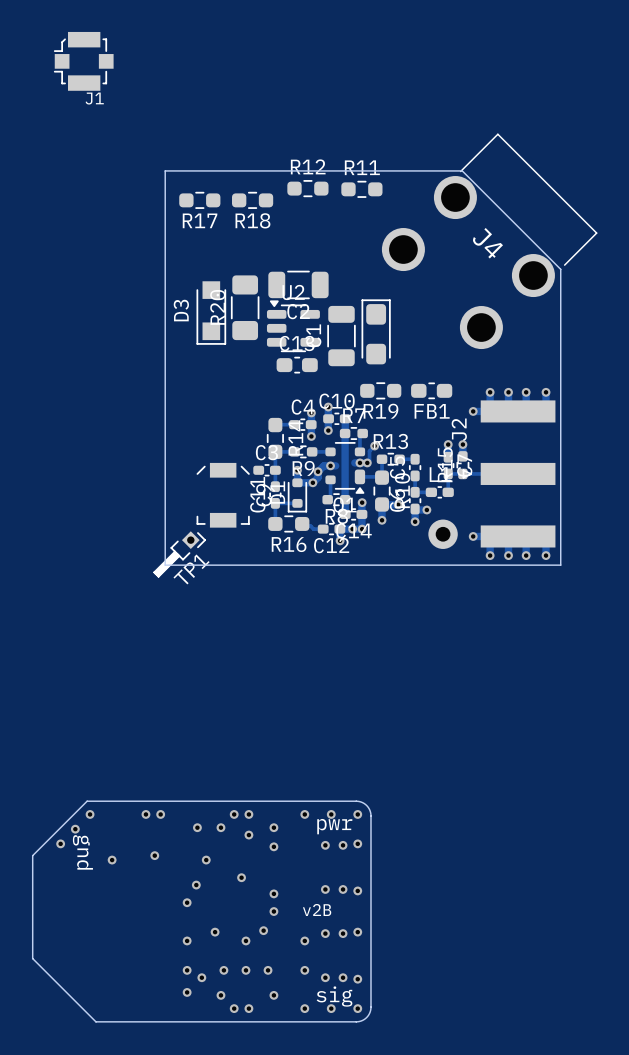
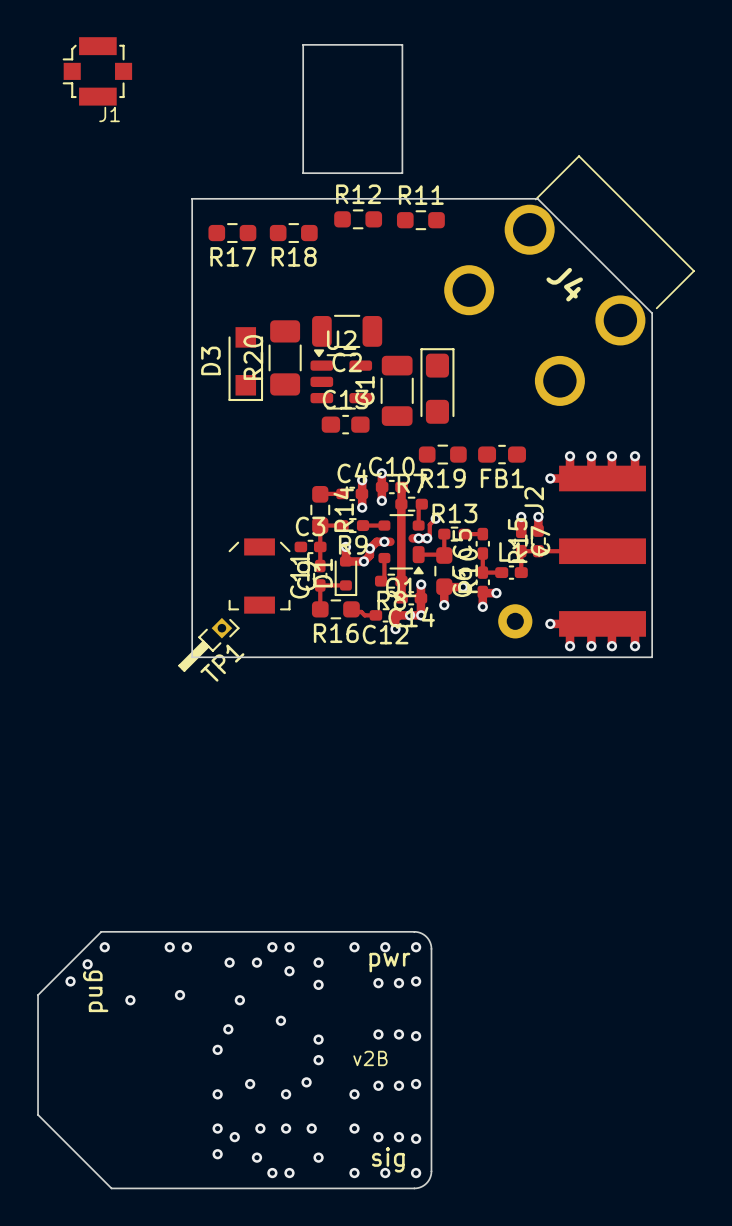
board edge: none -> (303, 44) (402, 44) (402, 173) (303, 173) (303, 44)

